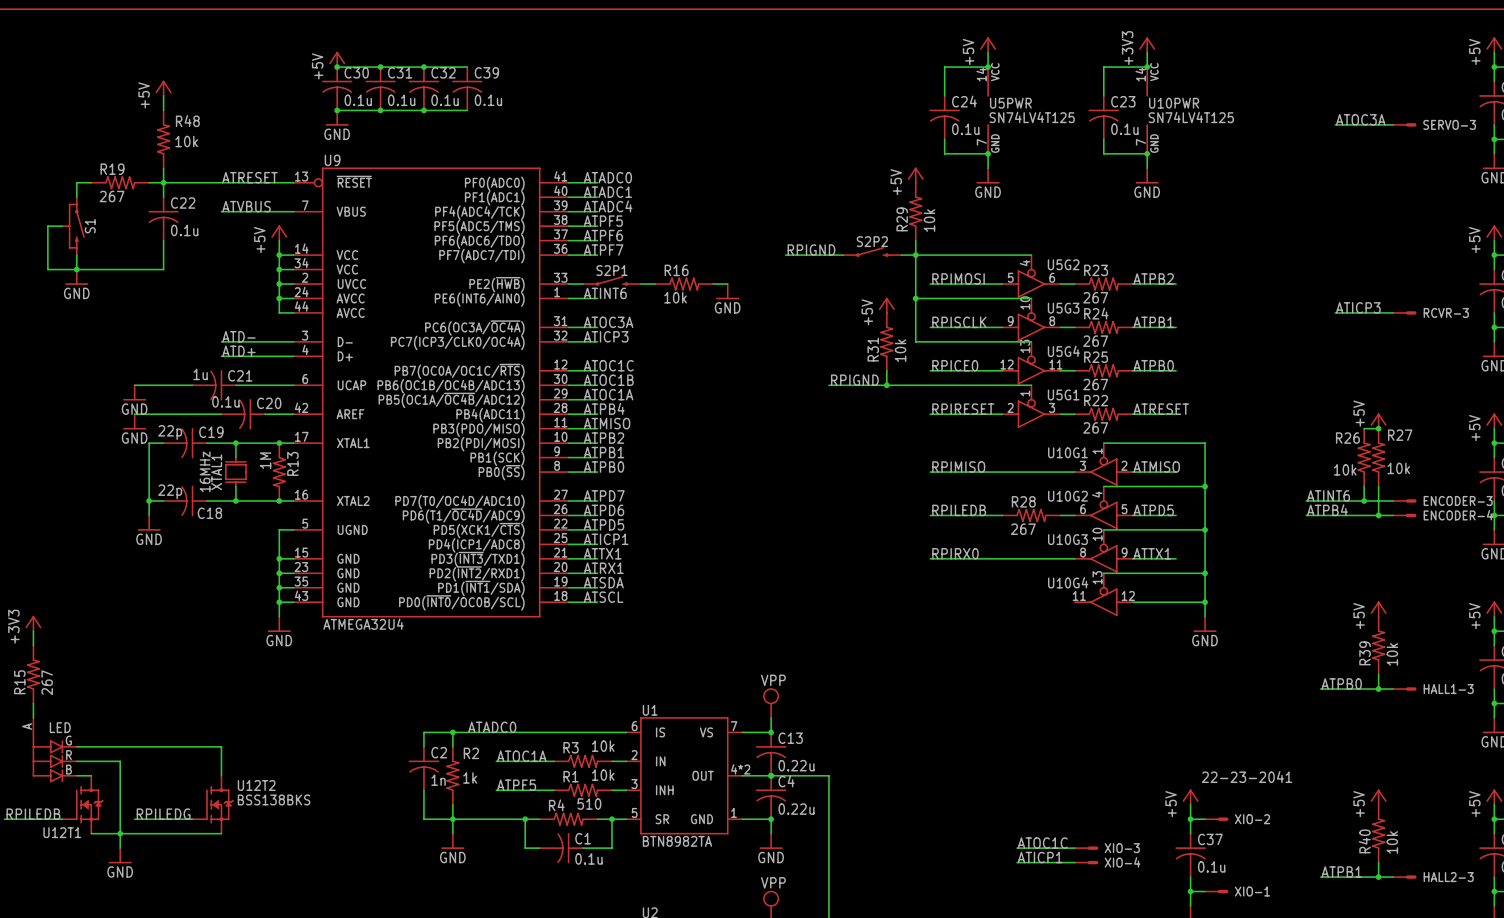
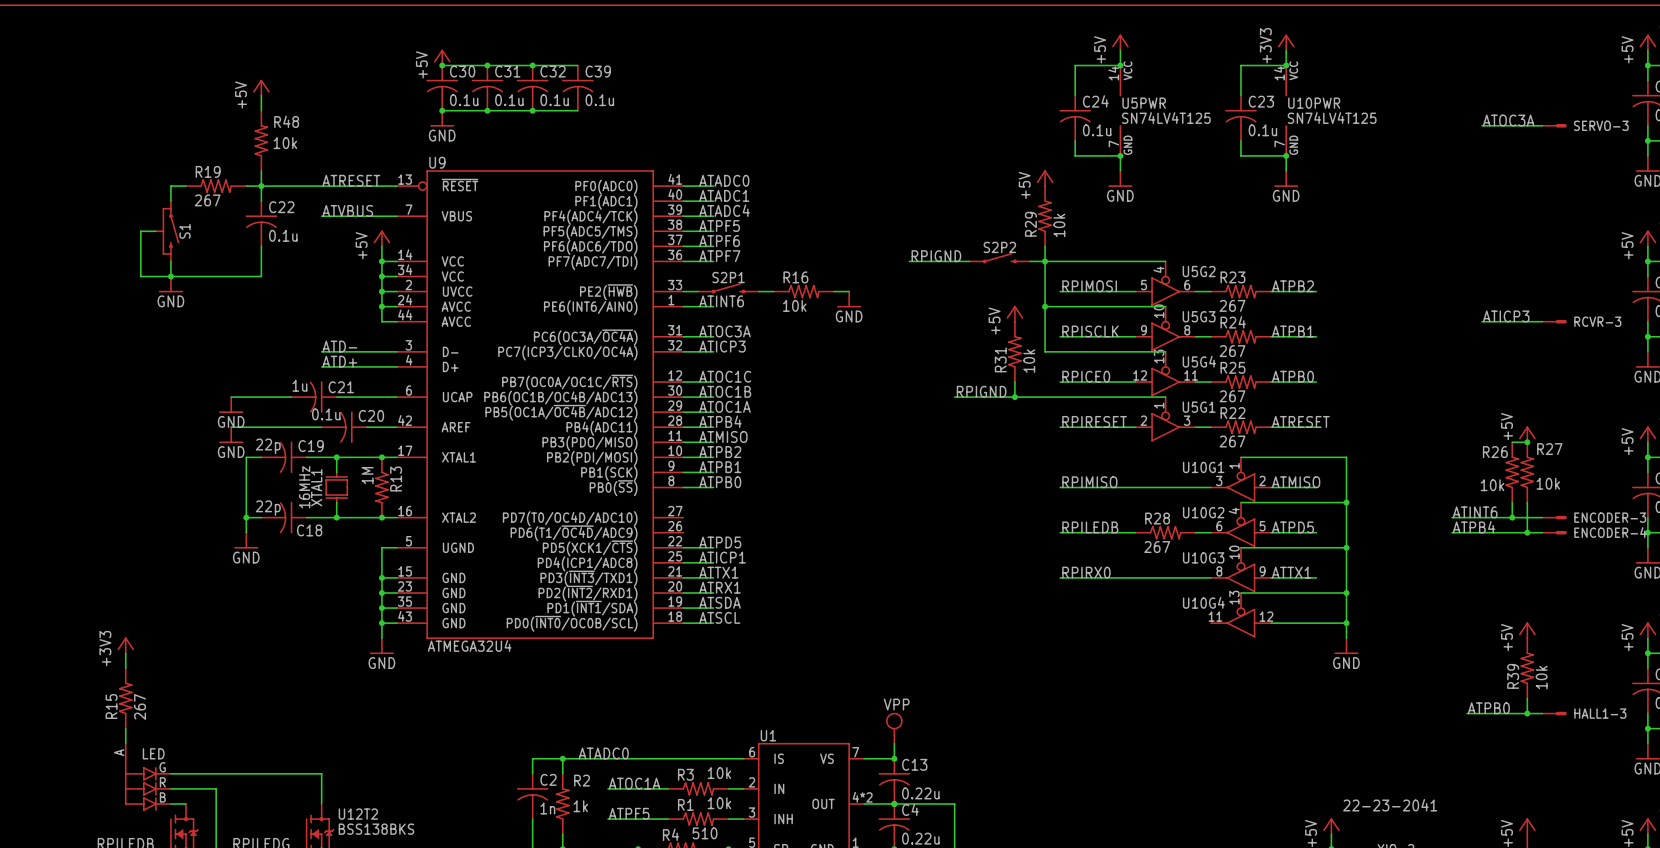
label: ATPD7 (604, 495) -> none
wire: (568, 500) (597, 500) -> none
label: ATPD6 (604, 510) -> none
wire: (568, 515) (597, 515) -> none

